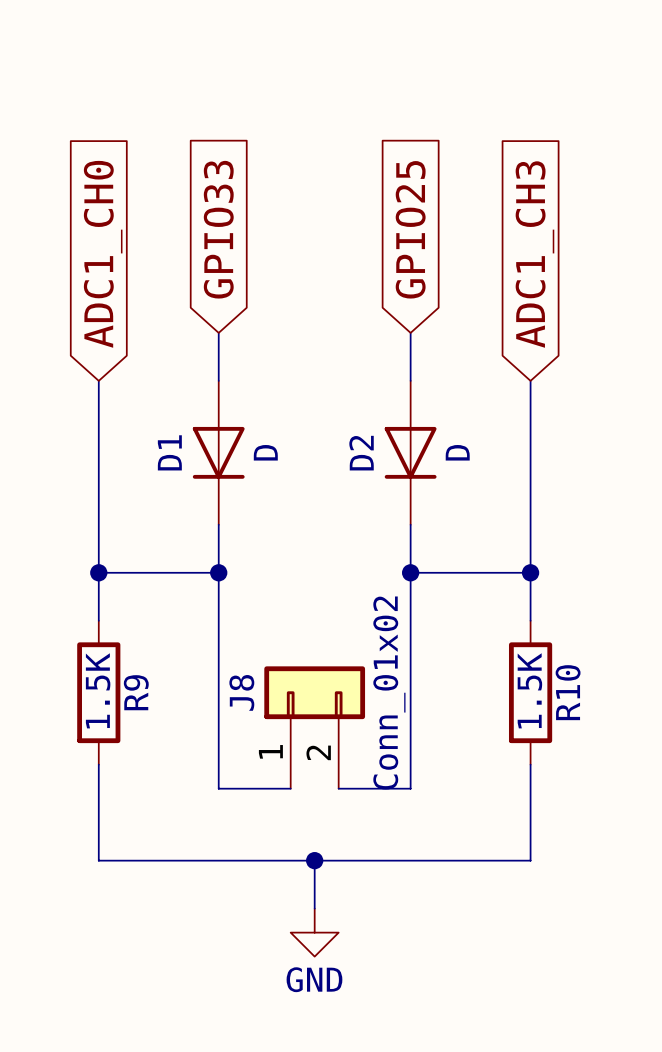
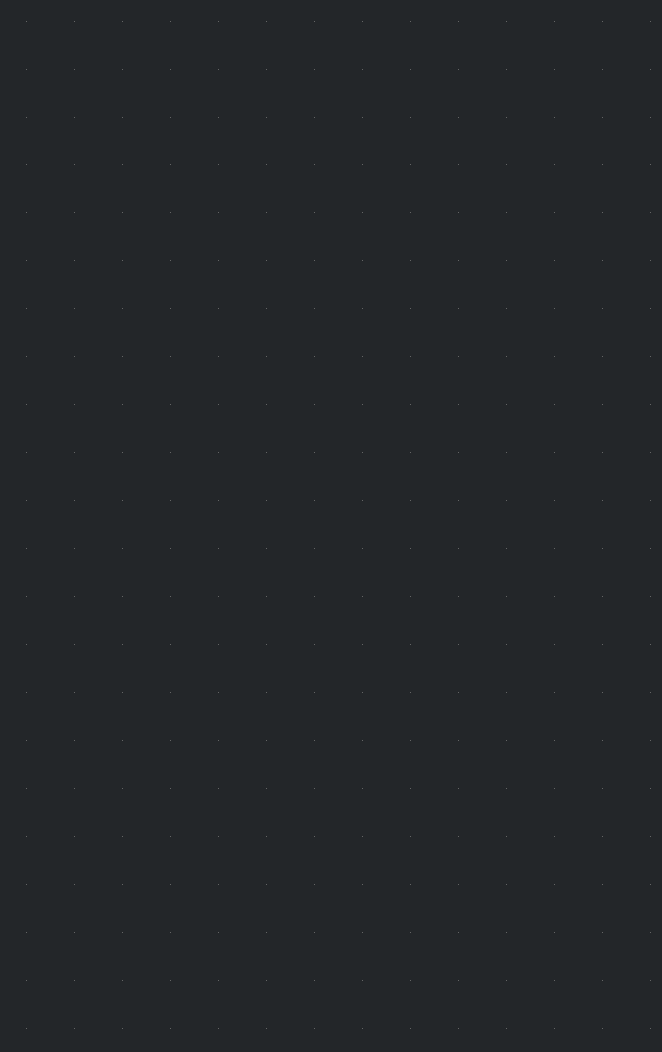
global label: GPIO33 (218, 229) -> none
global label: GPIO25 (410, 229) -> none
global label: ADC1_CH0 (103, 254) -> none
global label: ADC1_CH3 (534, 254) -> none
wire: (218, 332) (218, 380) -> none
wire: (410, 332) (410, 380) -> none
wire: (98, 380) (98, 620) -> none
wire: (530, 380) (530, 620) -> none
D1: D (218, 452) -> none
D2: D (410, 452) -> none
wire: (218, 524) (218, 788) (290, 788) -> none
wire: (410, 524) (410, 788) (338, 788) -> none
wire: (98, 572) (218, 572) -> none
junction: (98, 572) -> none
junction: (218, 572) -> none
wire: (410, 572) (530, 572) -> none
junction: (410, 572) -> none
junction: (530, 572) -> none
R9: 1.5K (98, 692) -> none
R10: 1.5K (530, 692) -> none
J8: Conn_01x02 (314, 727) -> none
wire: (98, 764) (98, 860) (530, 860) (530, 764) -> none
wire: (314, 860) (314, 908) -> none
junction: (314, 860) -> none
power symbol: GND (314, 932) -> none

